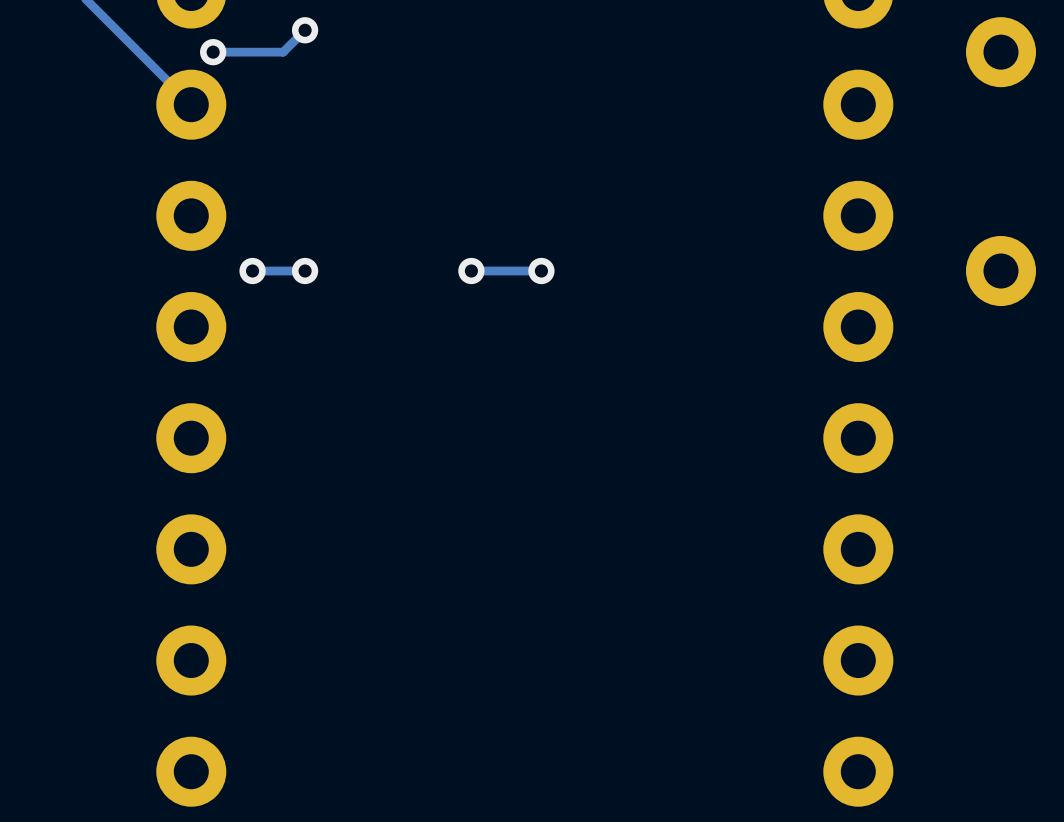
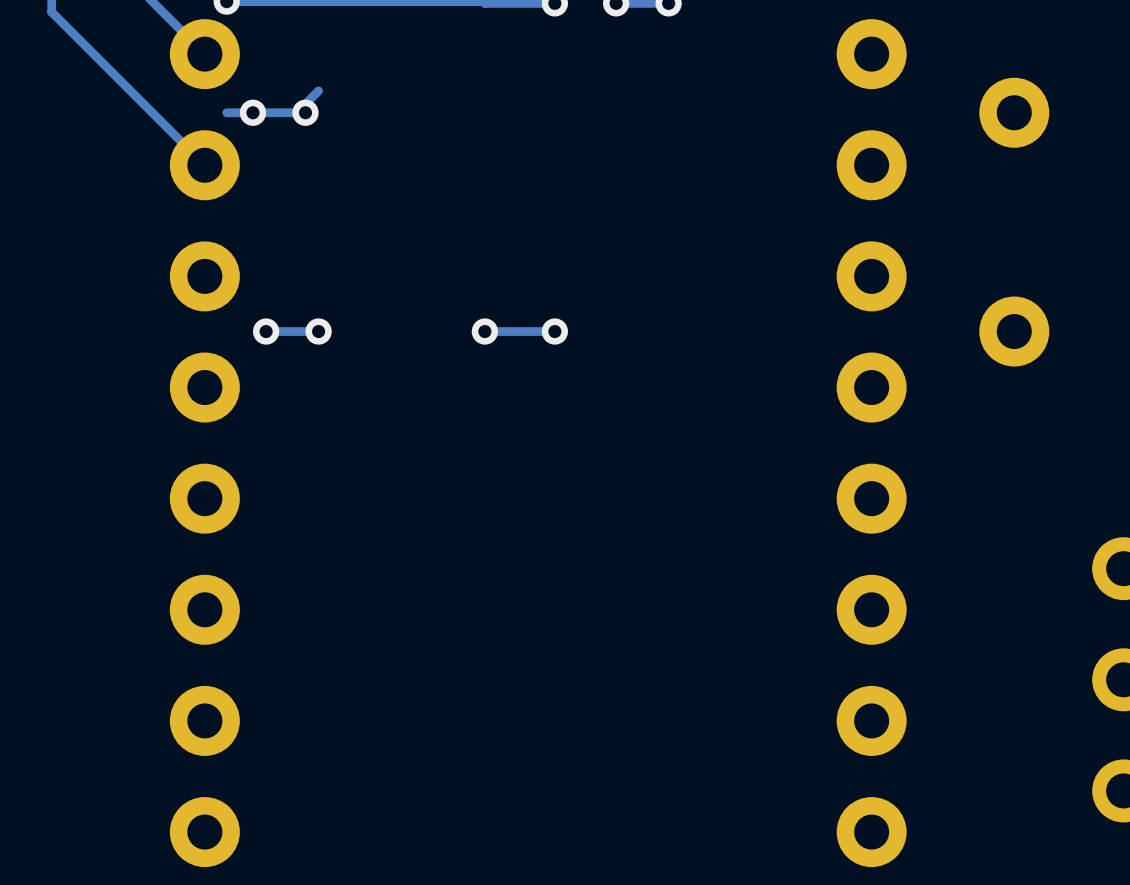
via position: (305, 30) -> (305, 112)
via position: (213, 52) -> (252, 112)

